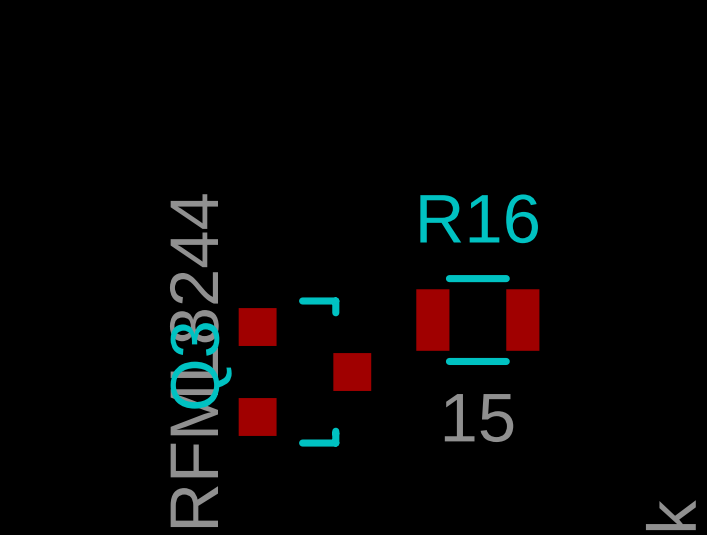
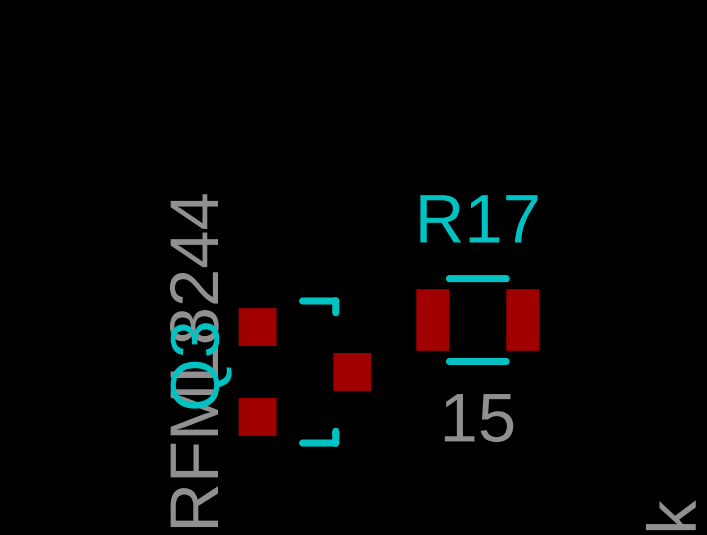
R16 name: R16 (479, 218) -> R17 (478, 218)

